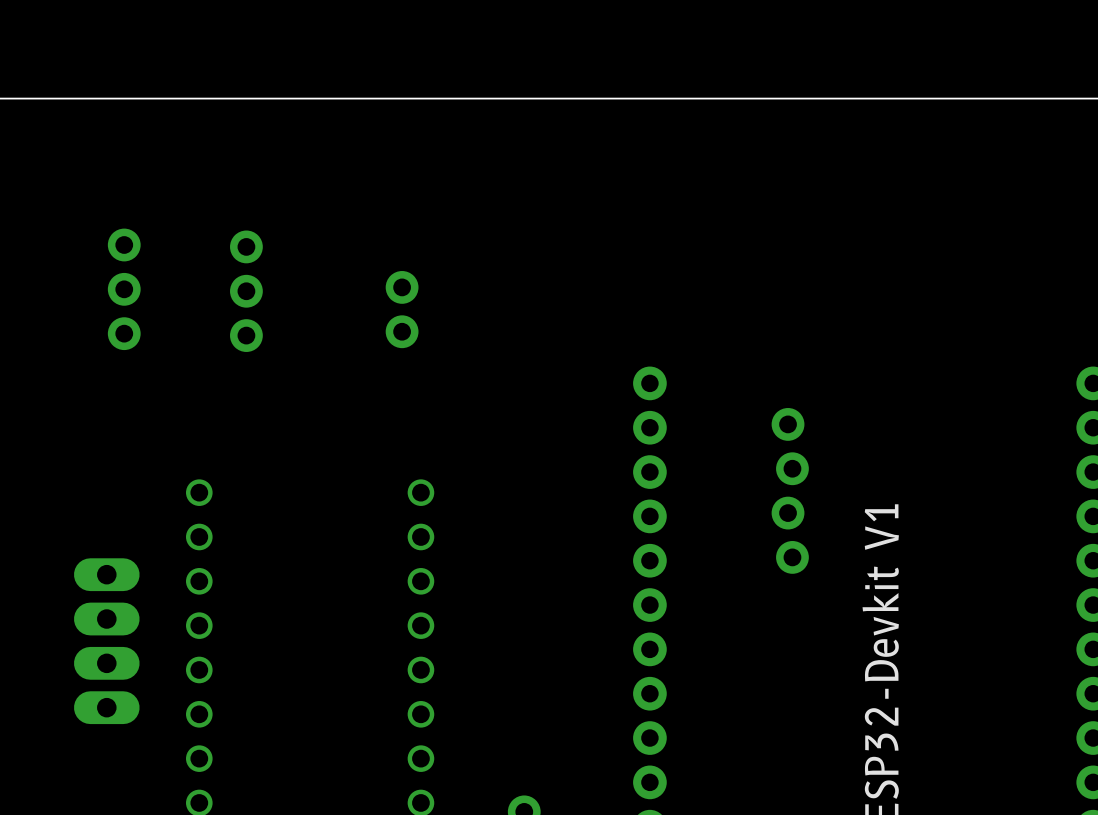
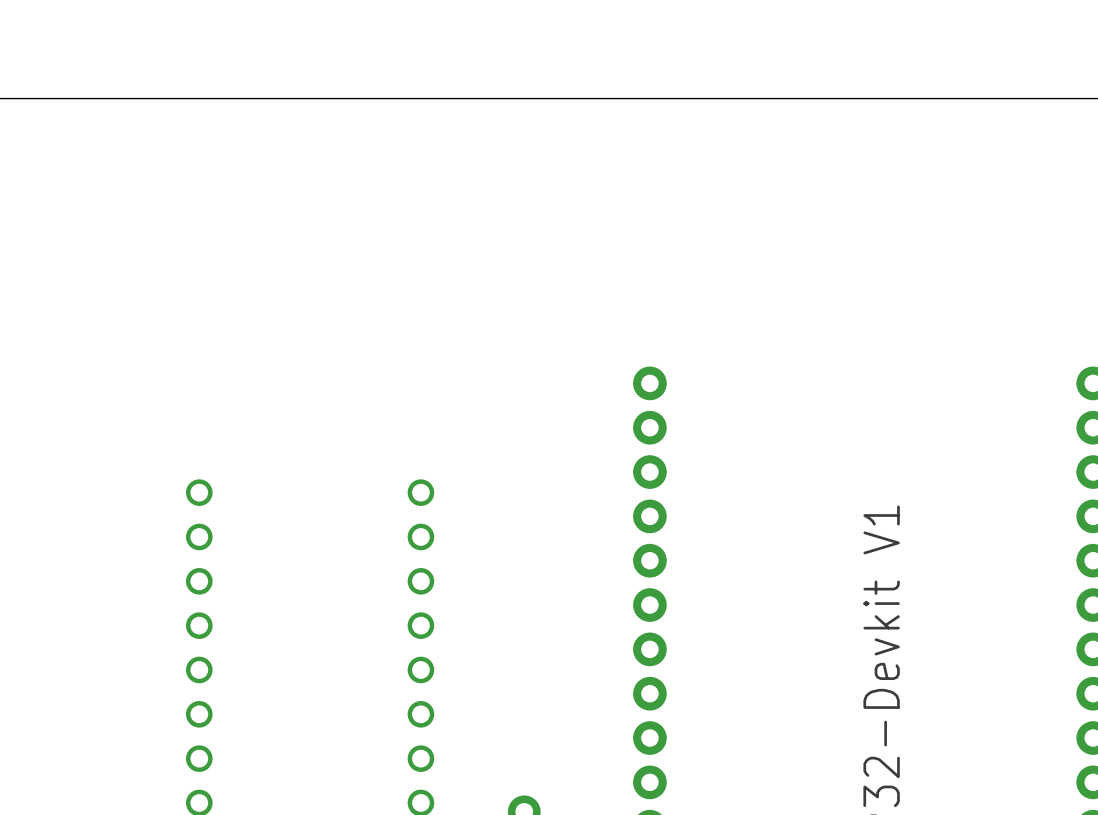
part: (124, 289) -> none
part: (246, 291) -> none
part: (402, 309) -> none
part: (790, 490) -> none
part: (106, 641) -> none

